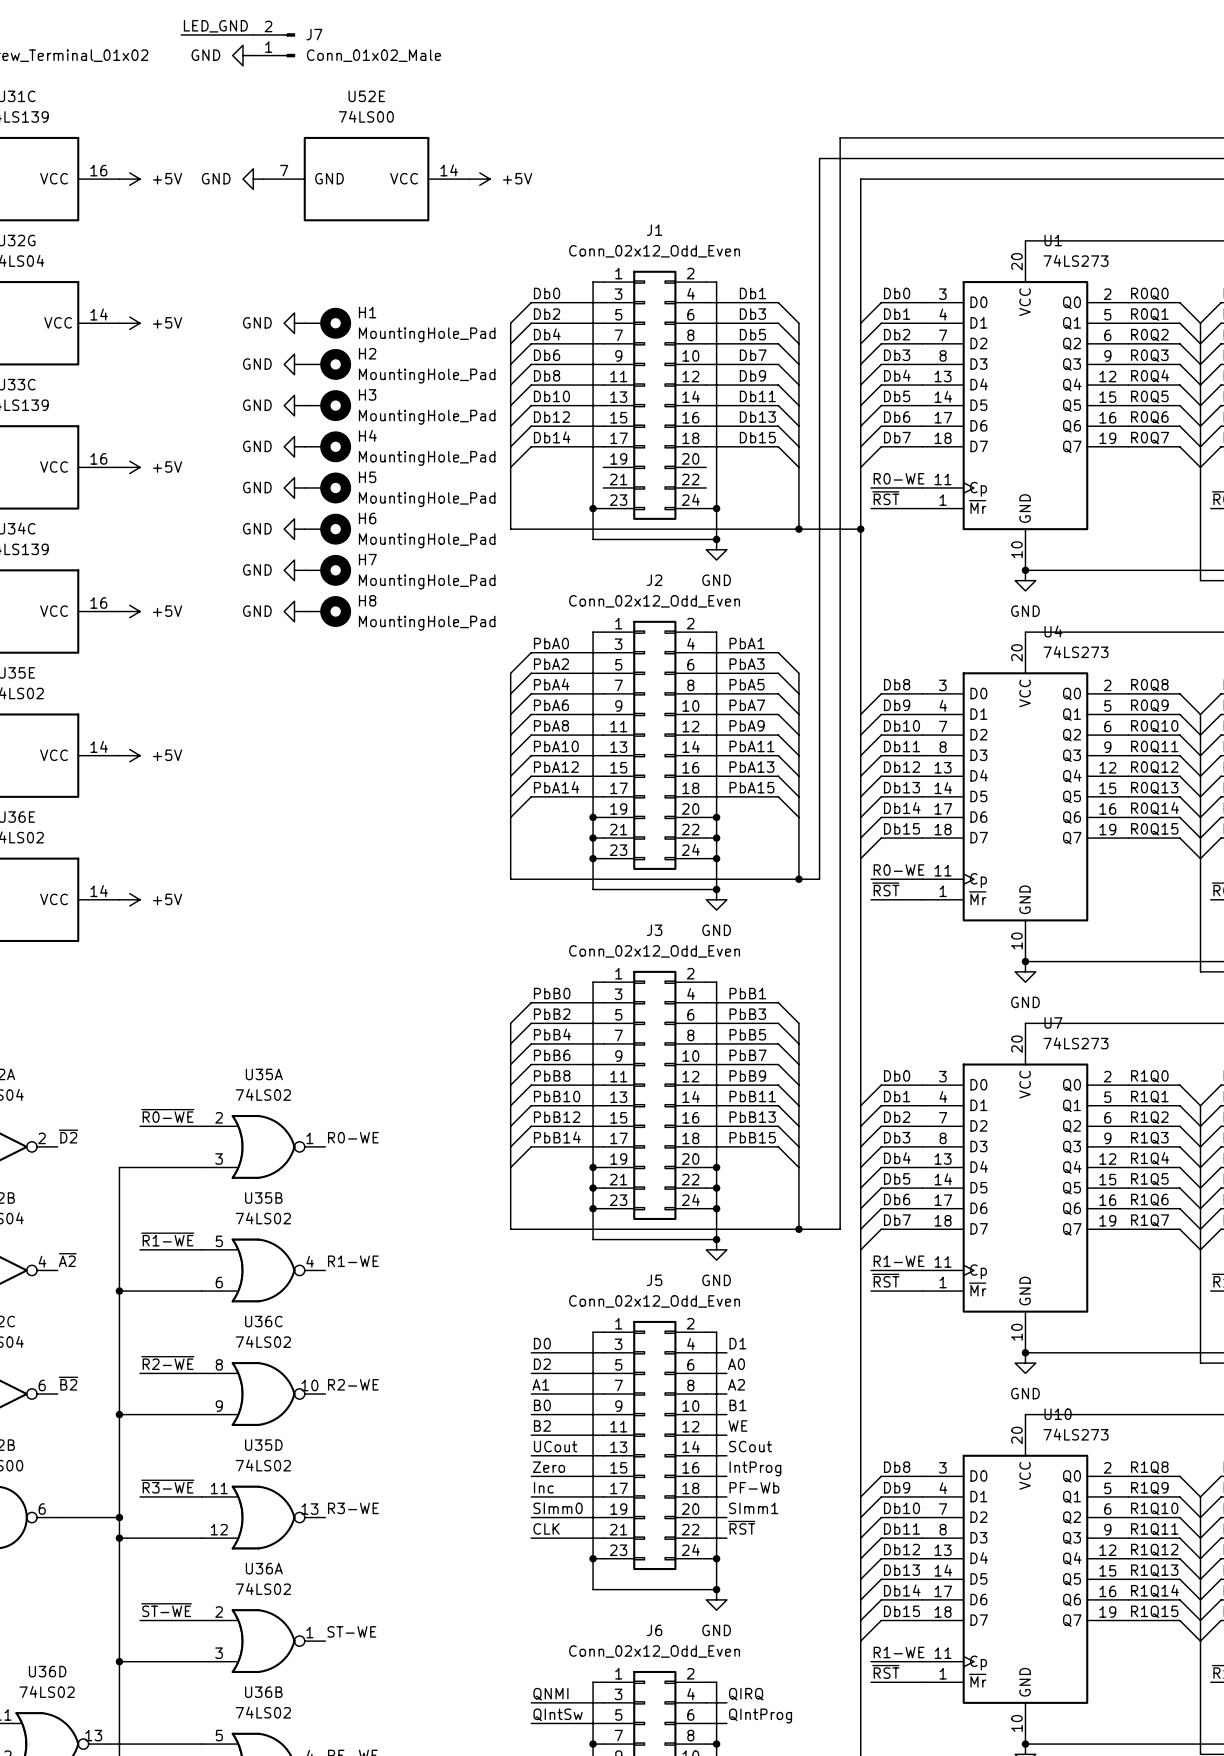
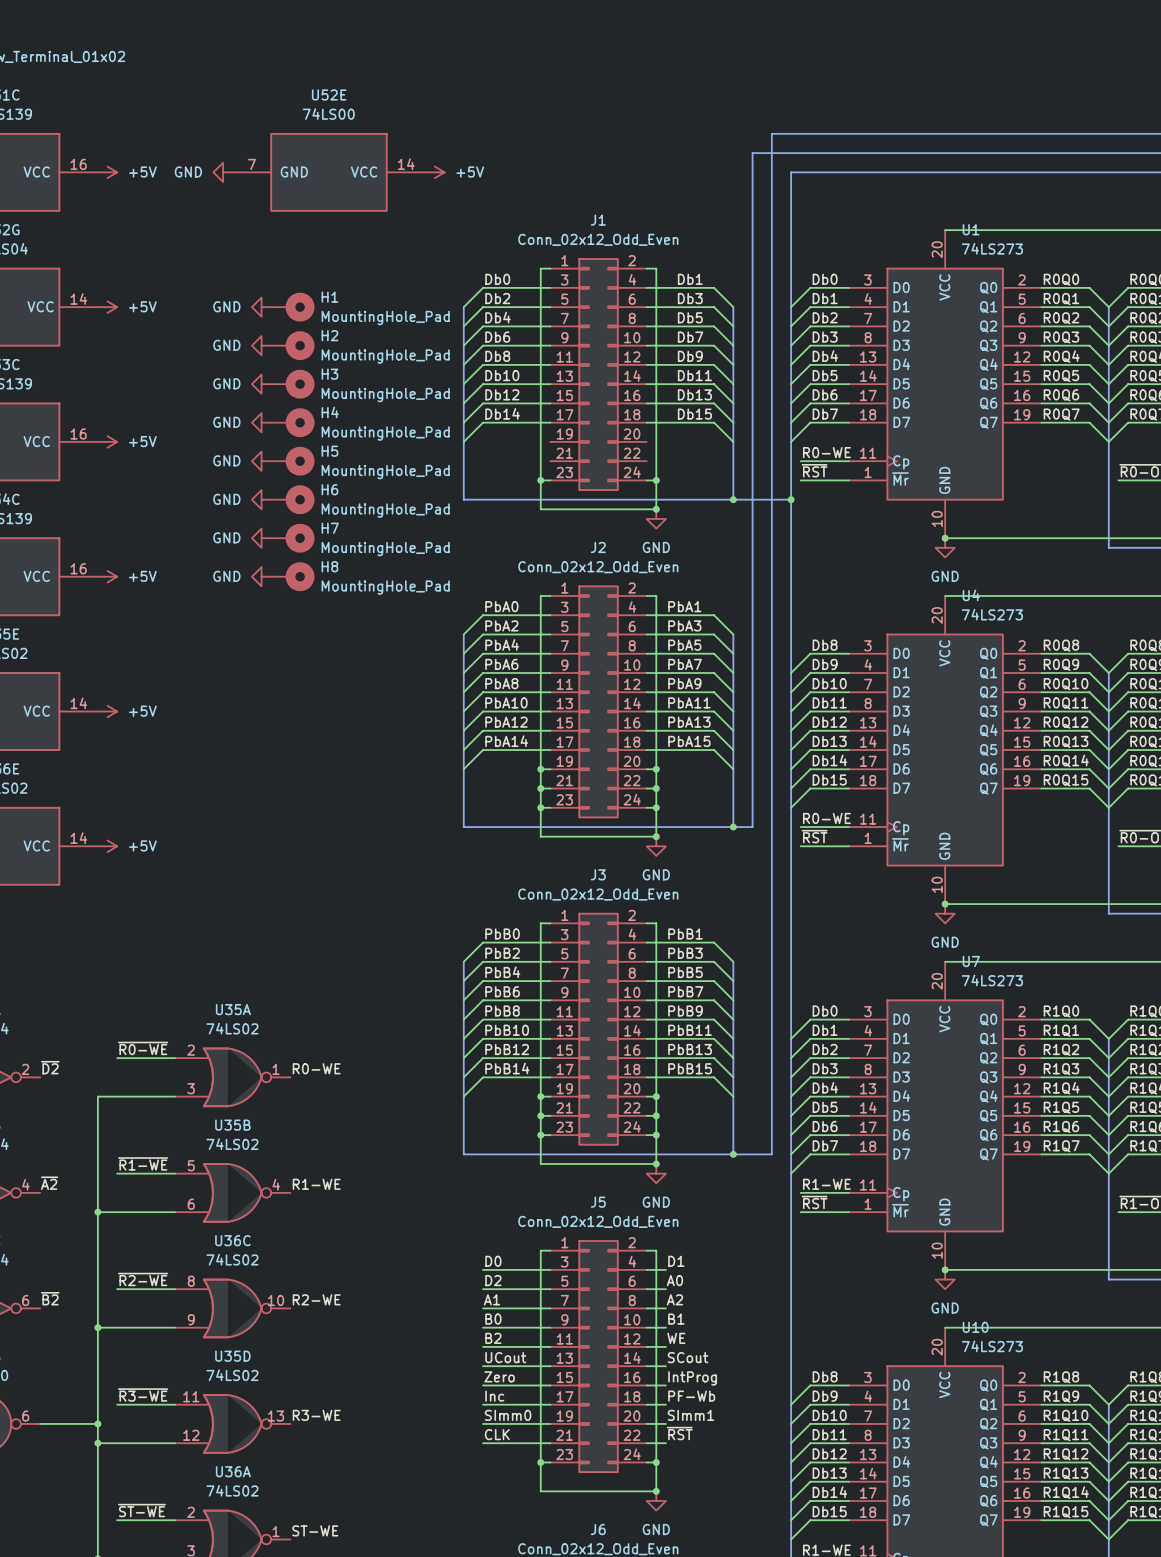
label: LED_GND (215, 26) -> none
wire: (181, 34) (253, 34) -> none
J7: Conn_01x02_Male (274, 45) -> none
power symbol: GND (242, 55) -> none

